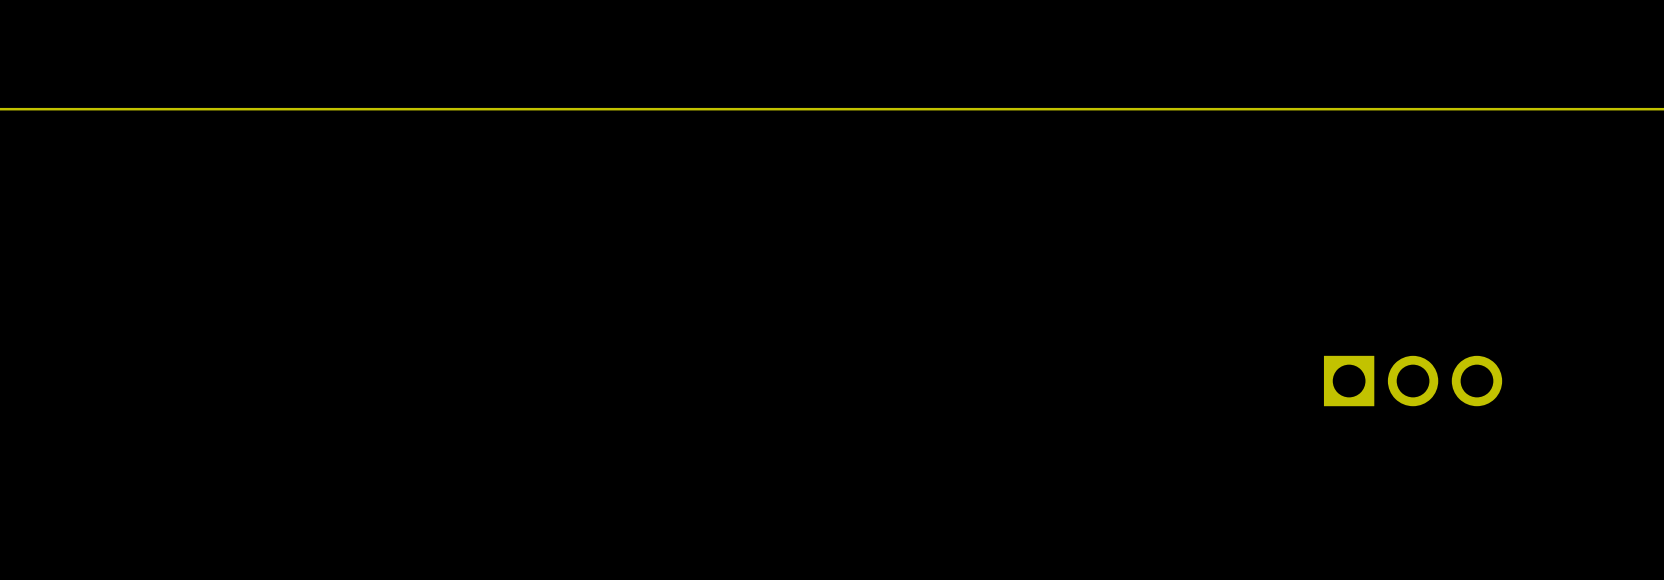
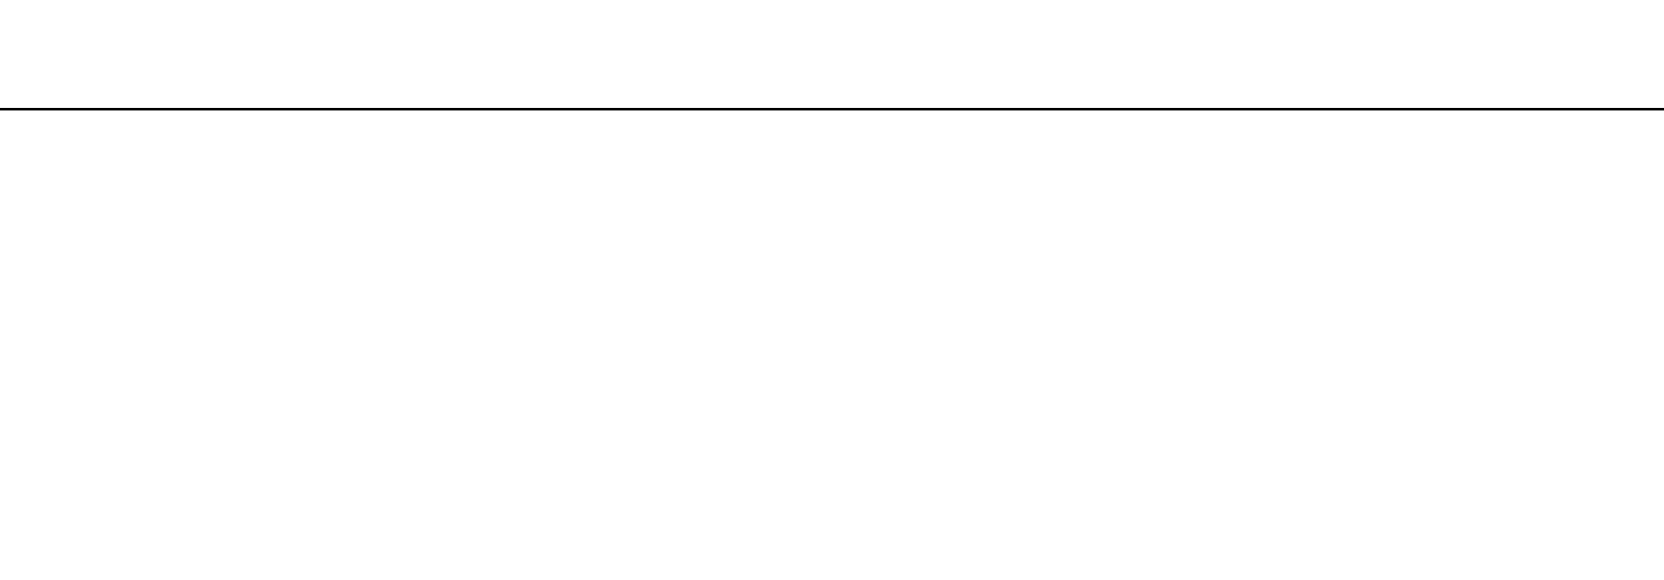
part: (1413, 381) -> none

